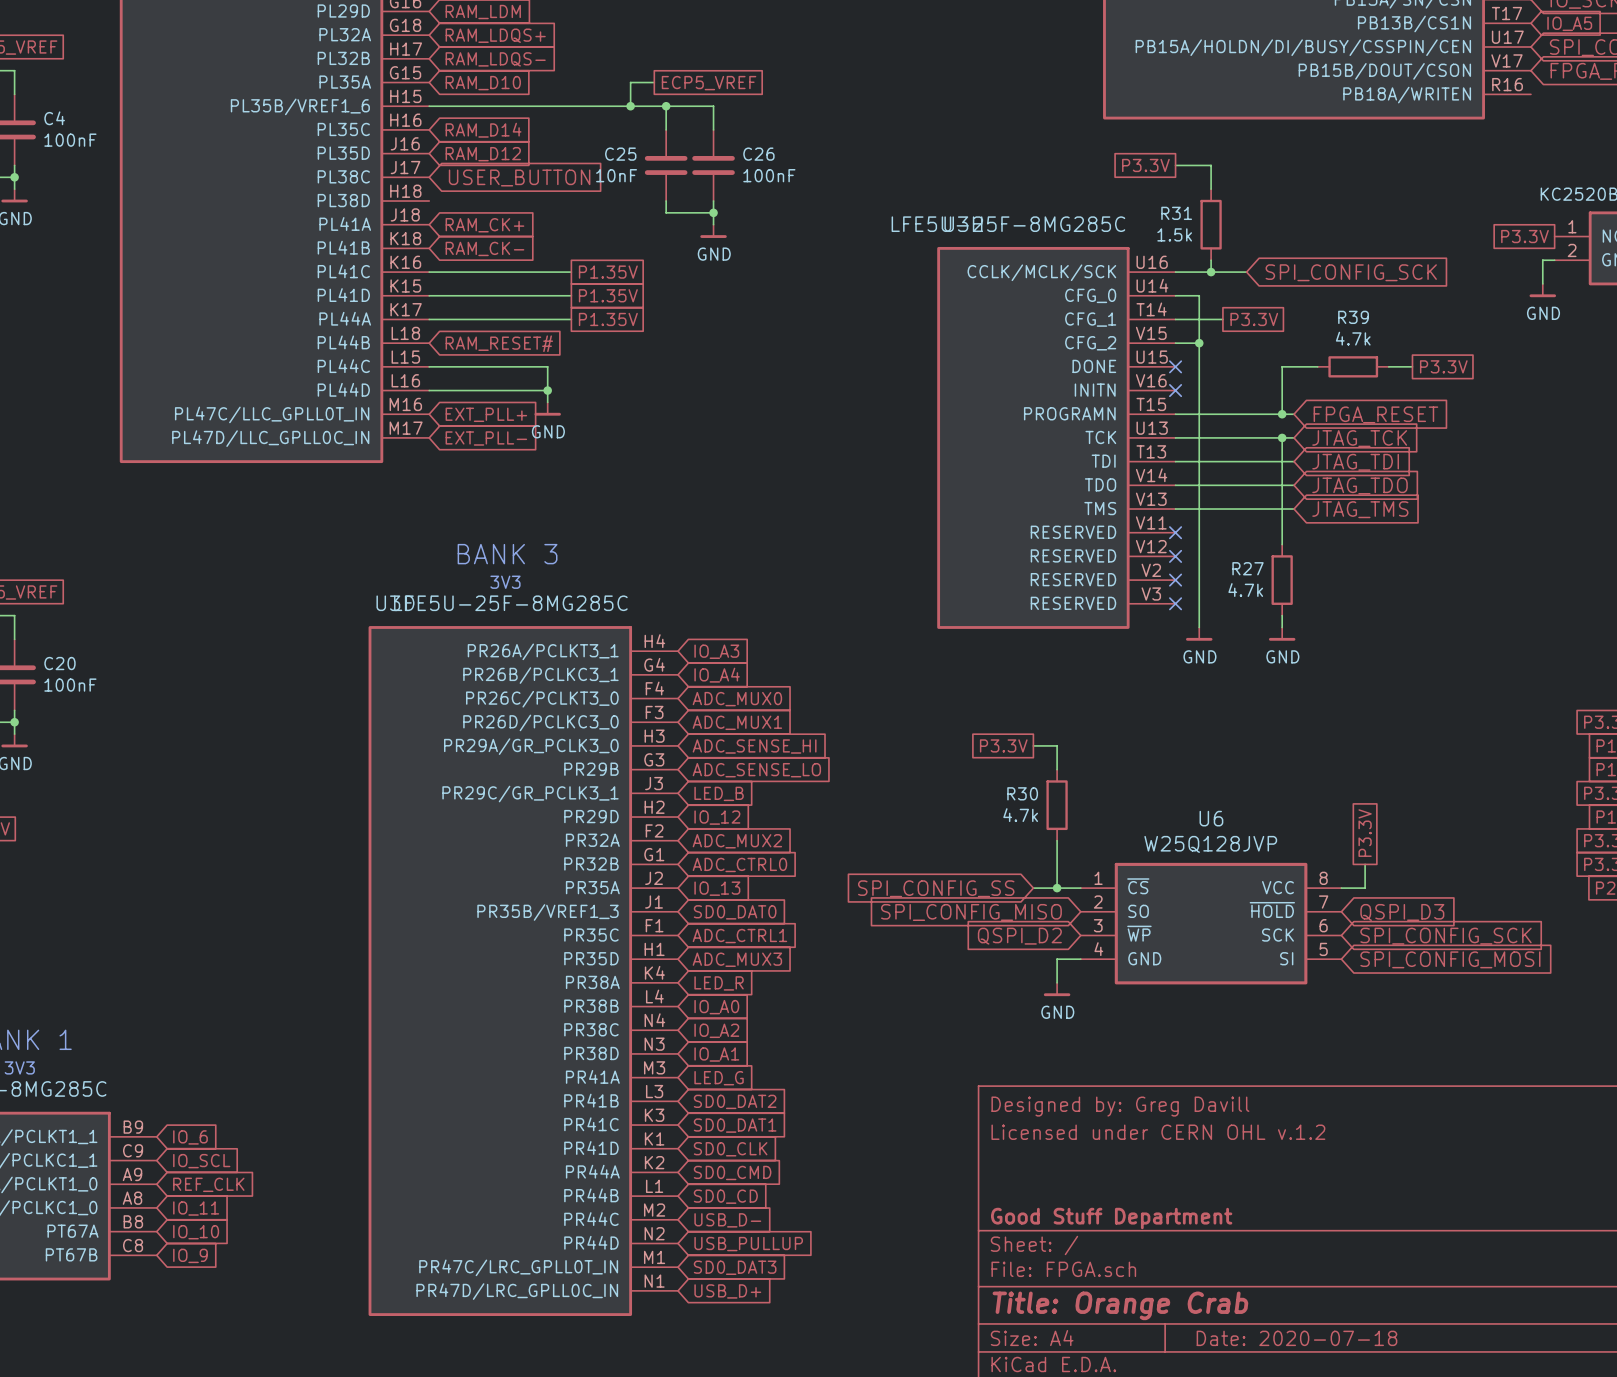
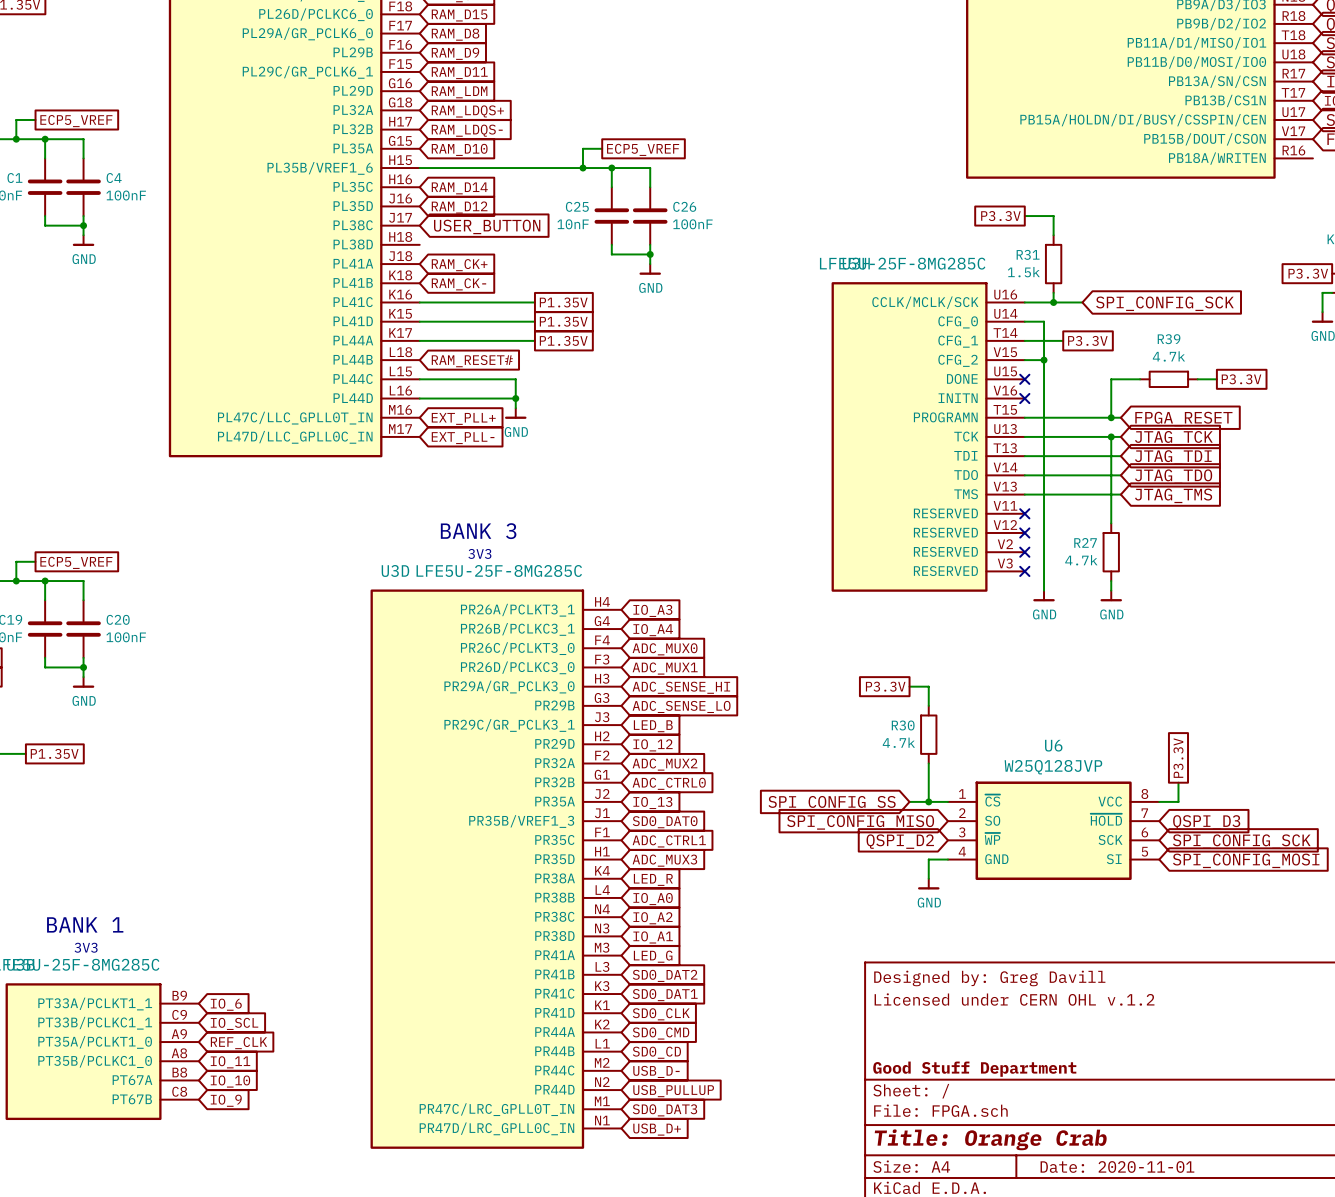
title block: Date: 2020-07-18 (1296, 1338) -> Date: 2020-11-01 (1117, 1166)

